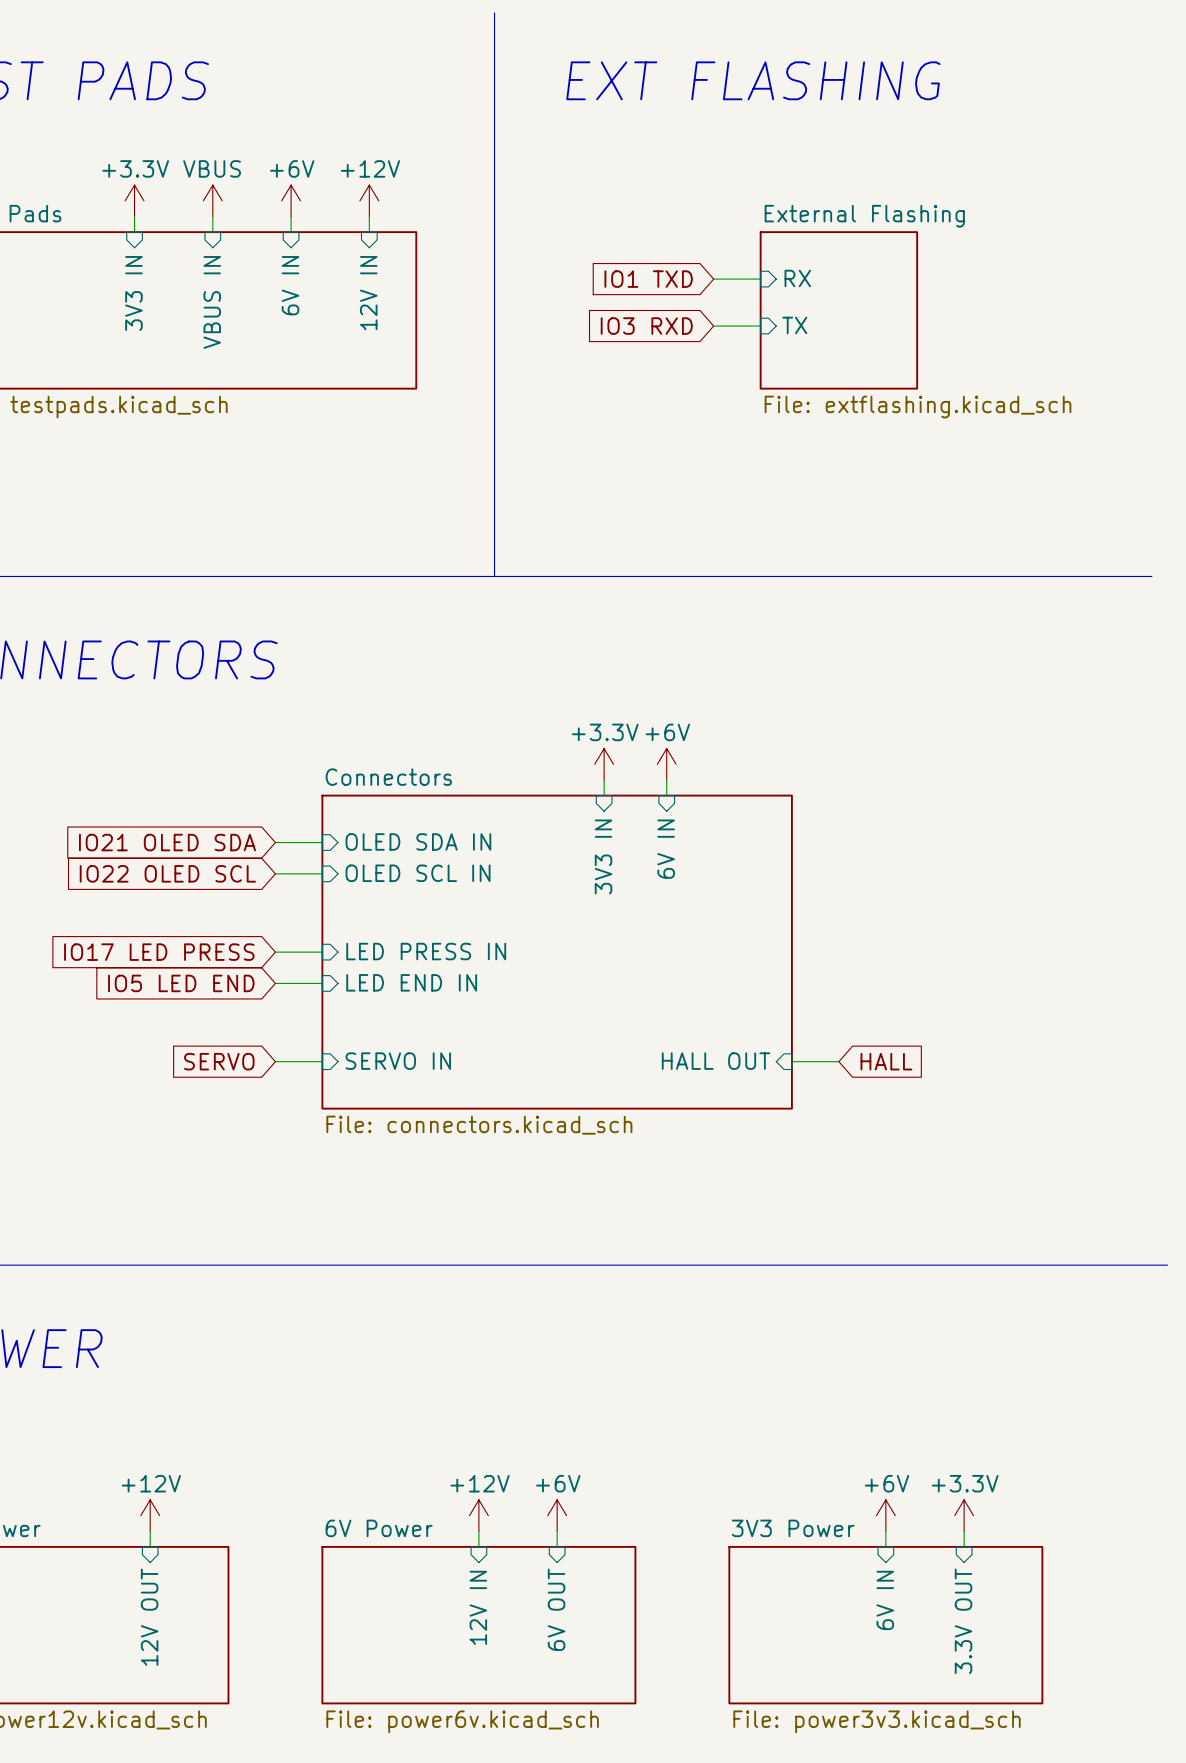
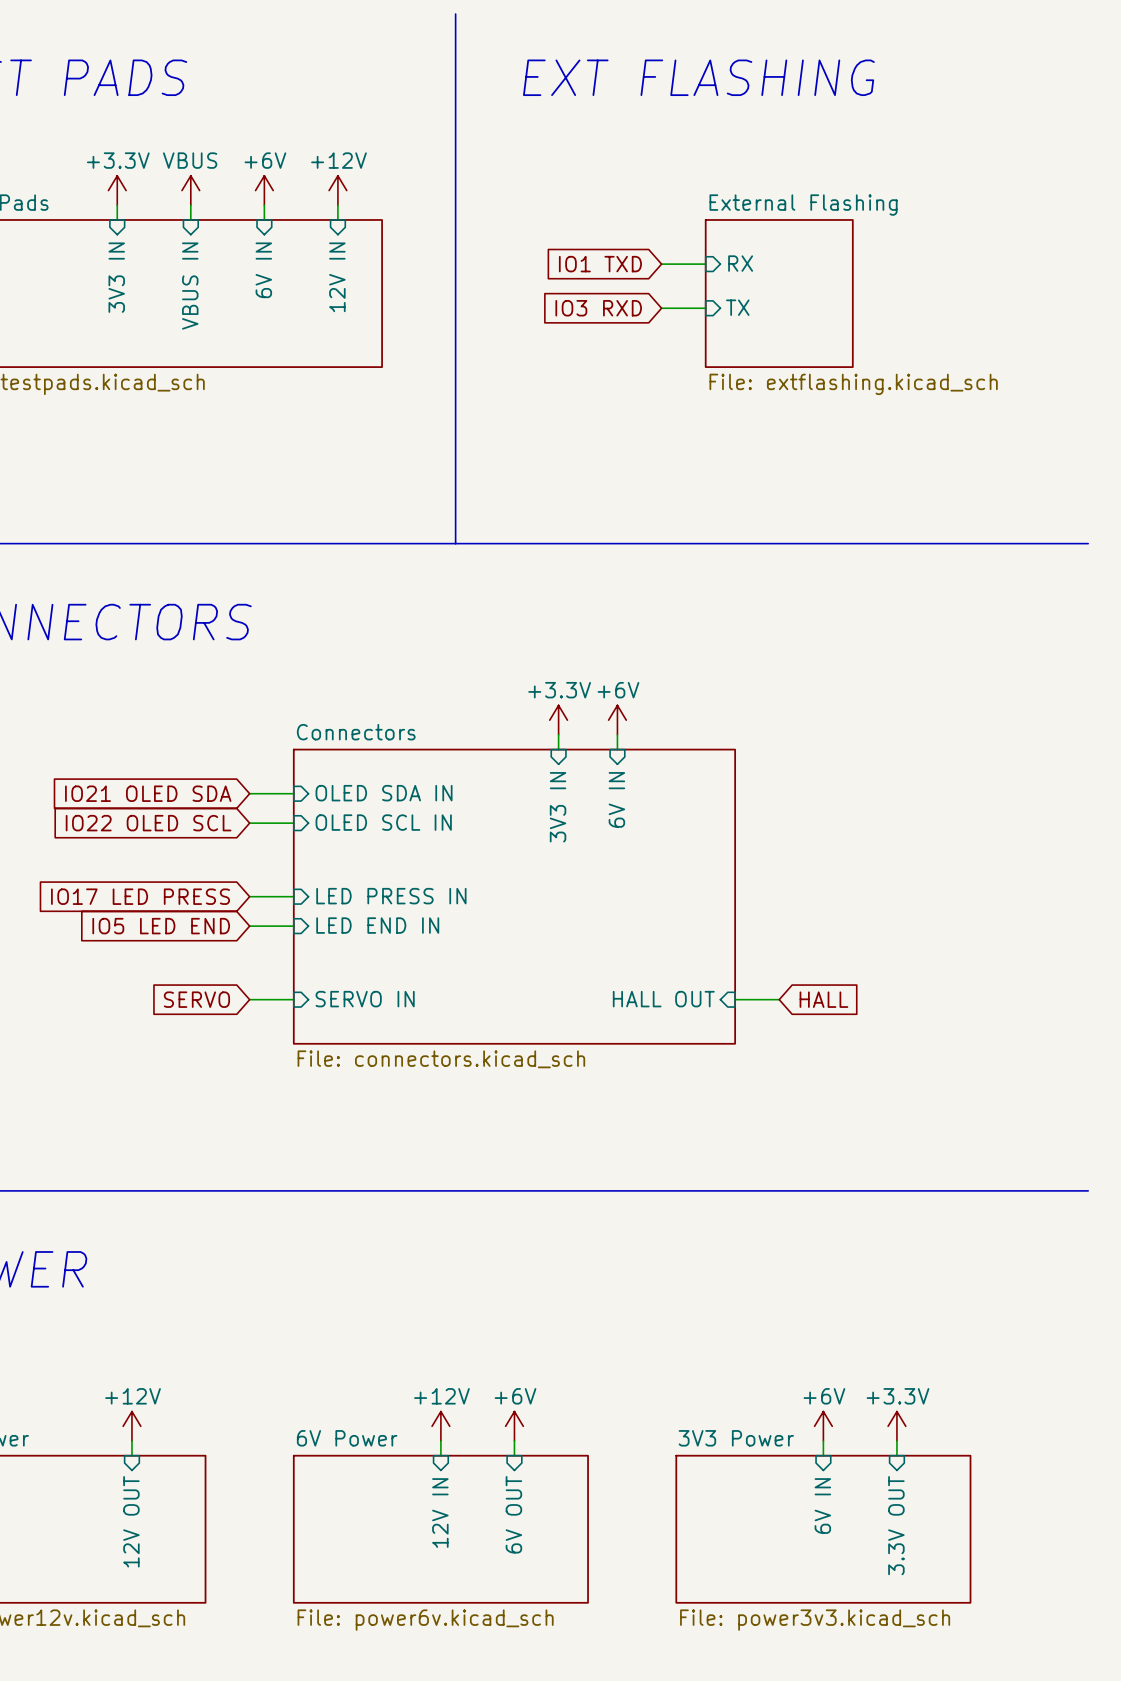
line: none -> (1073, 543) (1088, 543)

